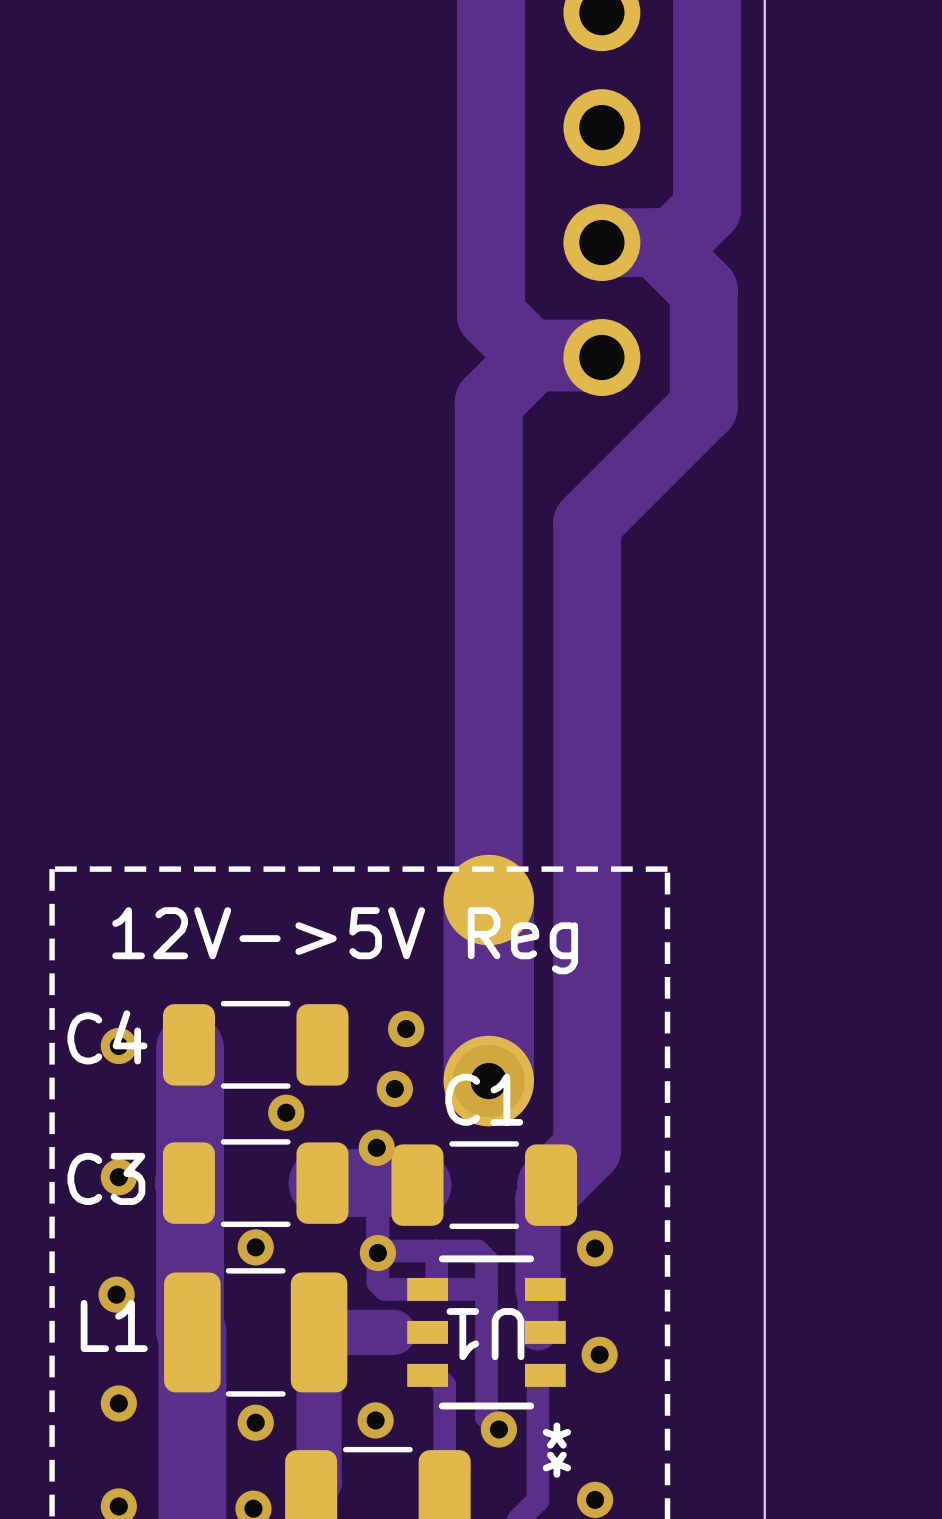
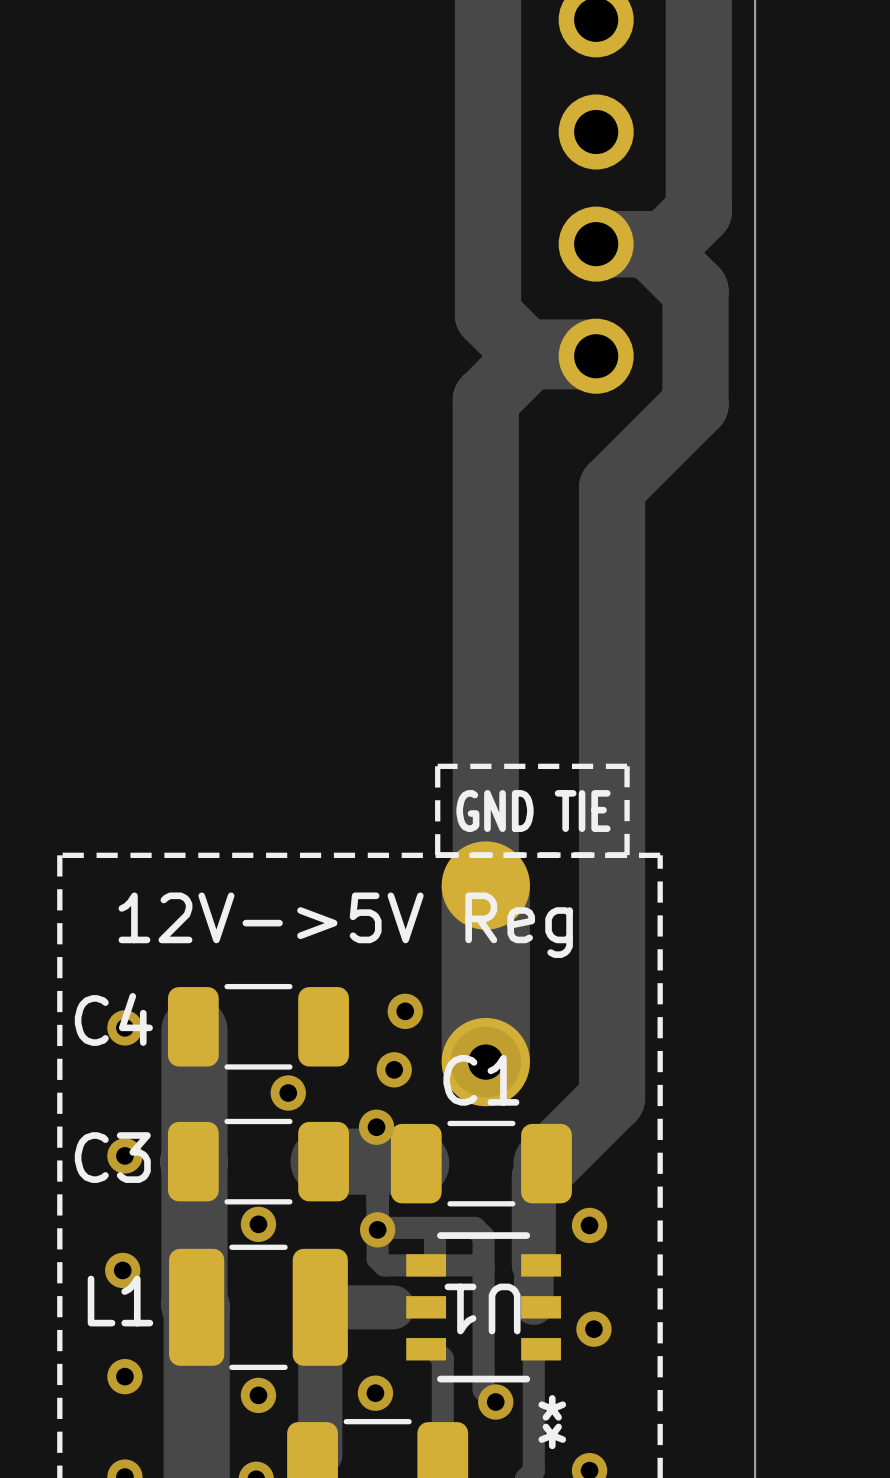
track: (618, 492) (587, 523) (587, 1148) -> (612, 487) (612, 1098) (581, 1128)
line: none -> (627, 766) (437, 766) (437, 855) (627, 855) (627, 766)
text: none -> GND TIE (533, 811)

